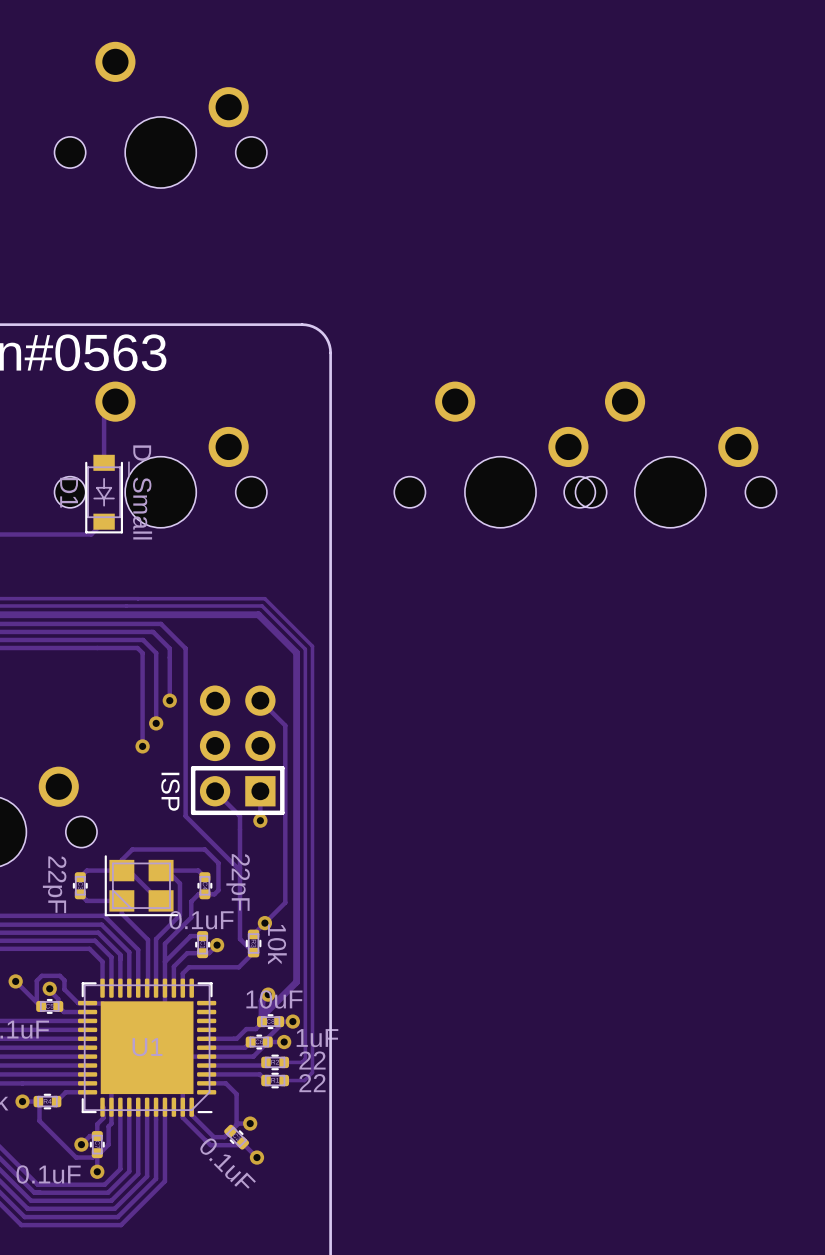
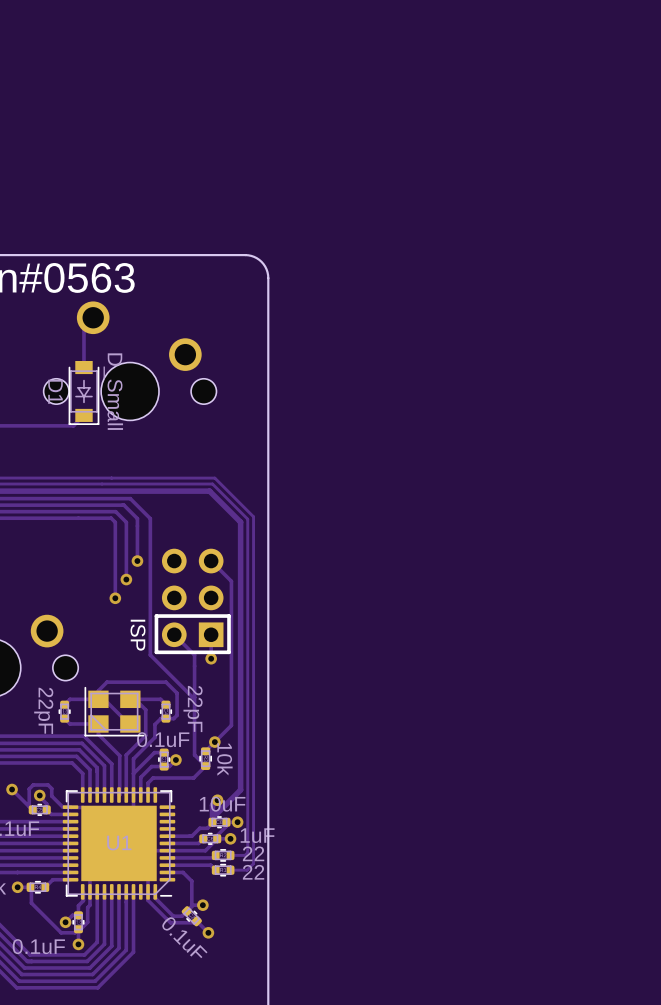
part: (160, 114) -> none
part: (500, 454) -> none
part: (670, 454) -> none

